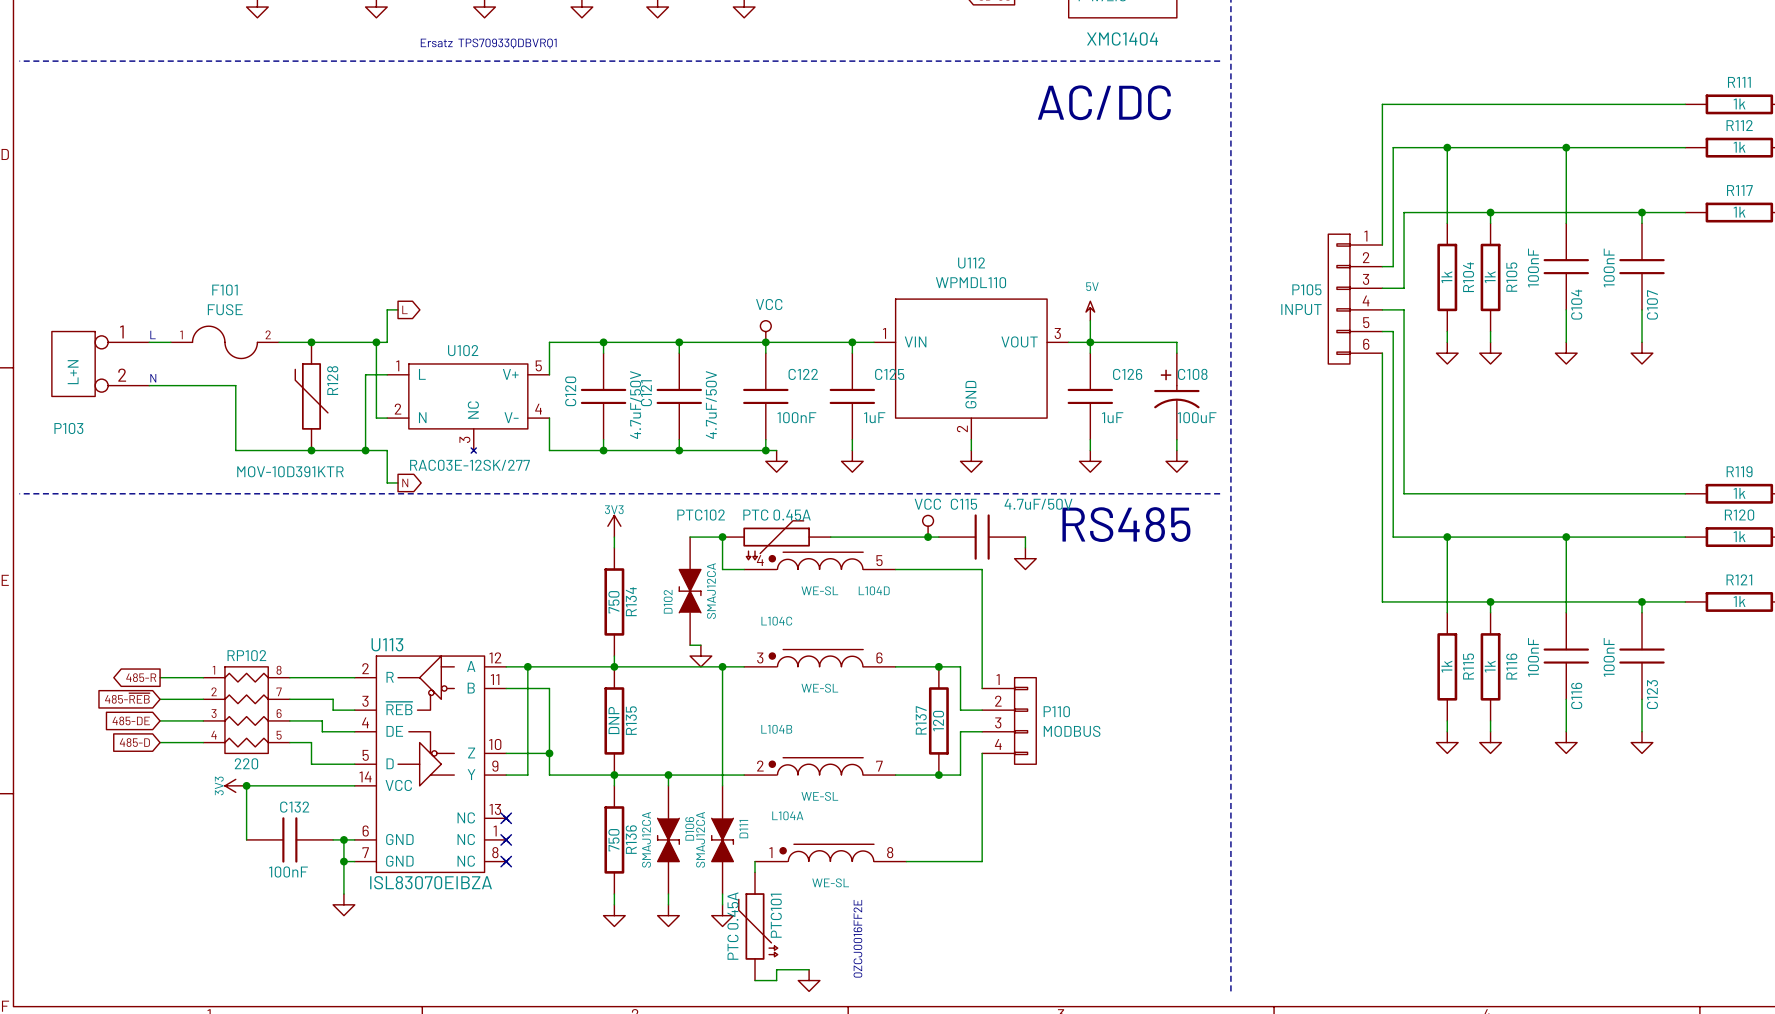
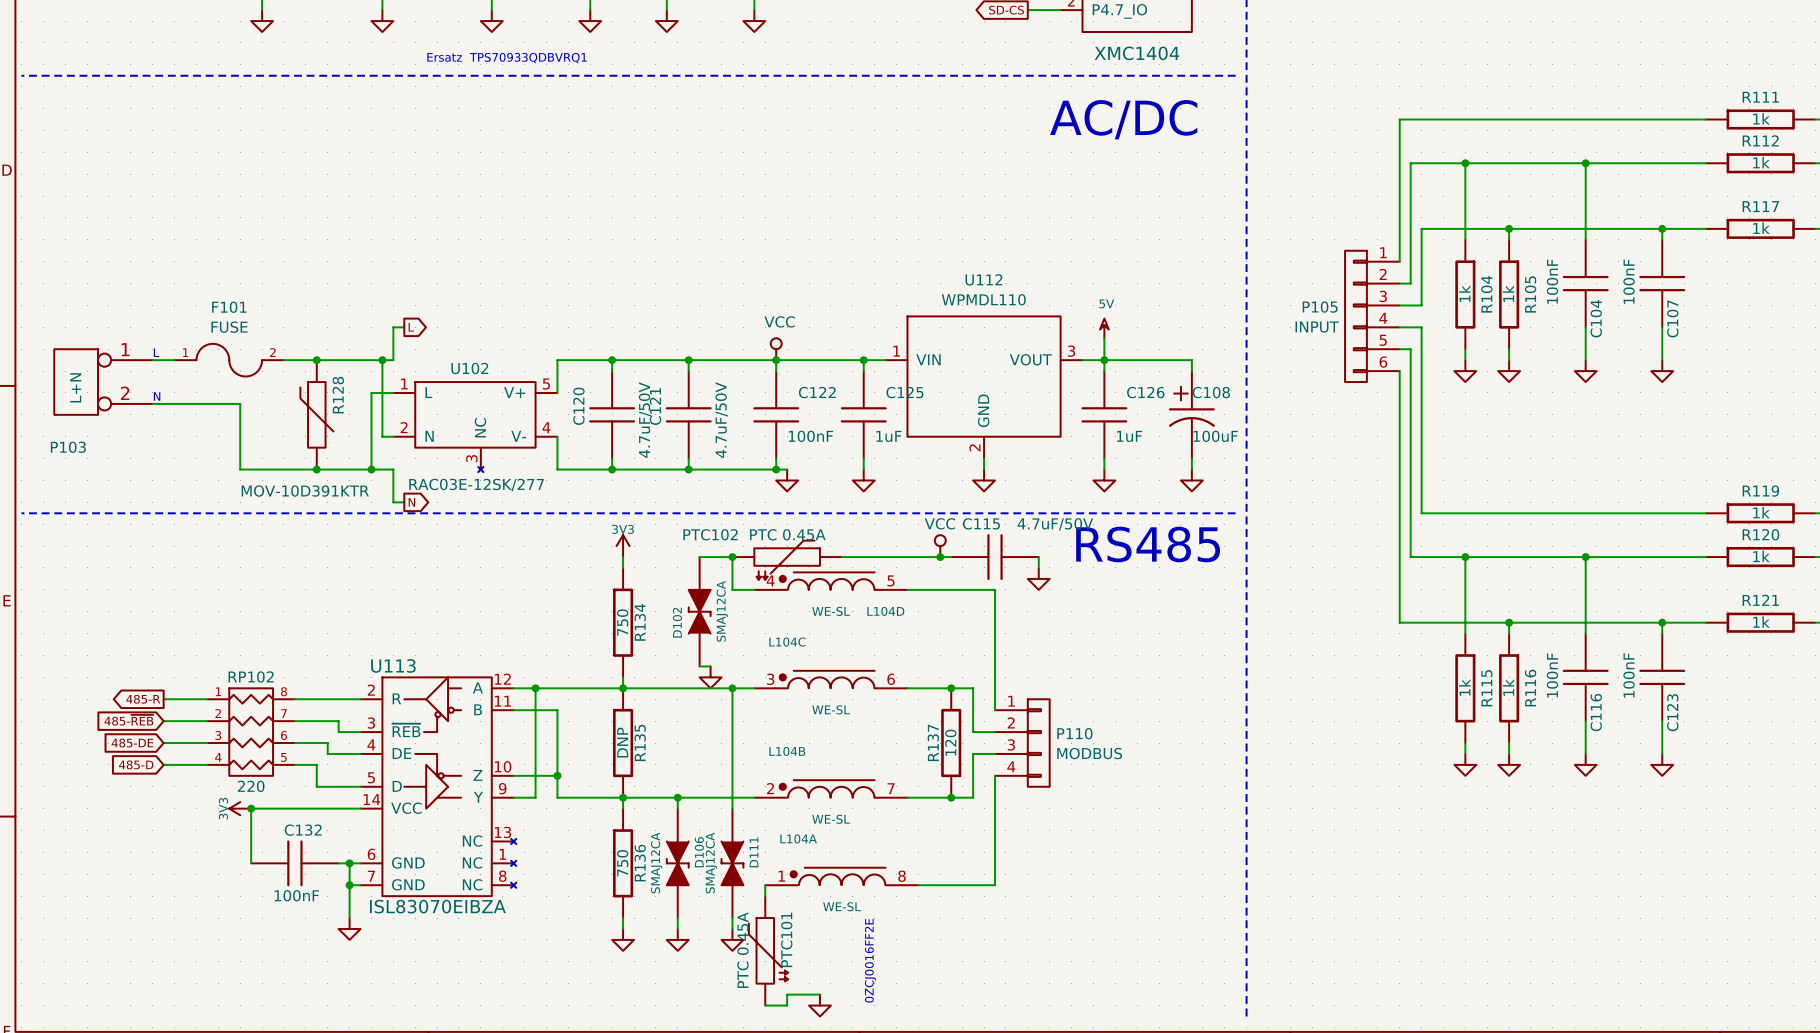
no-connect mark: (506, 818) -> none
no-connect mark: (506, 839) -> none
no-connect mark: (506, 861) -> none

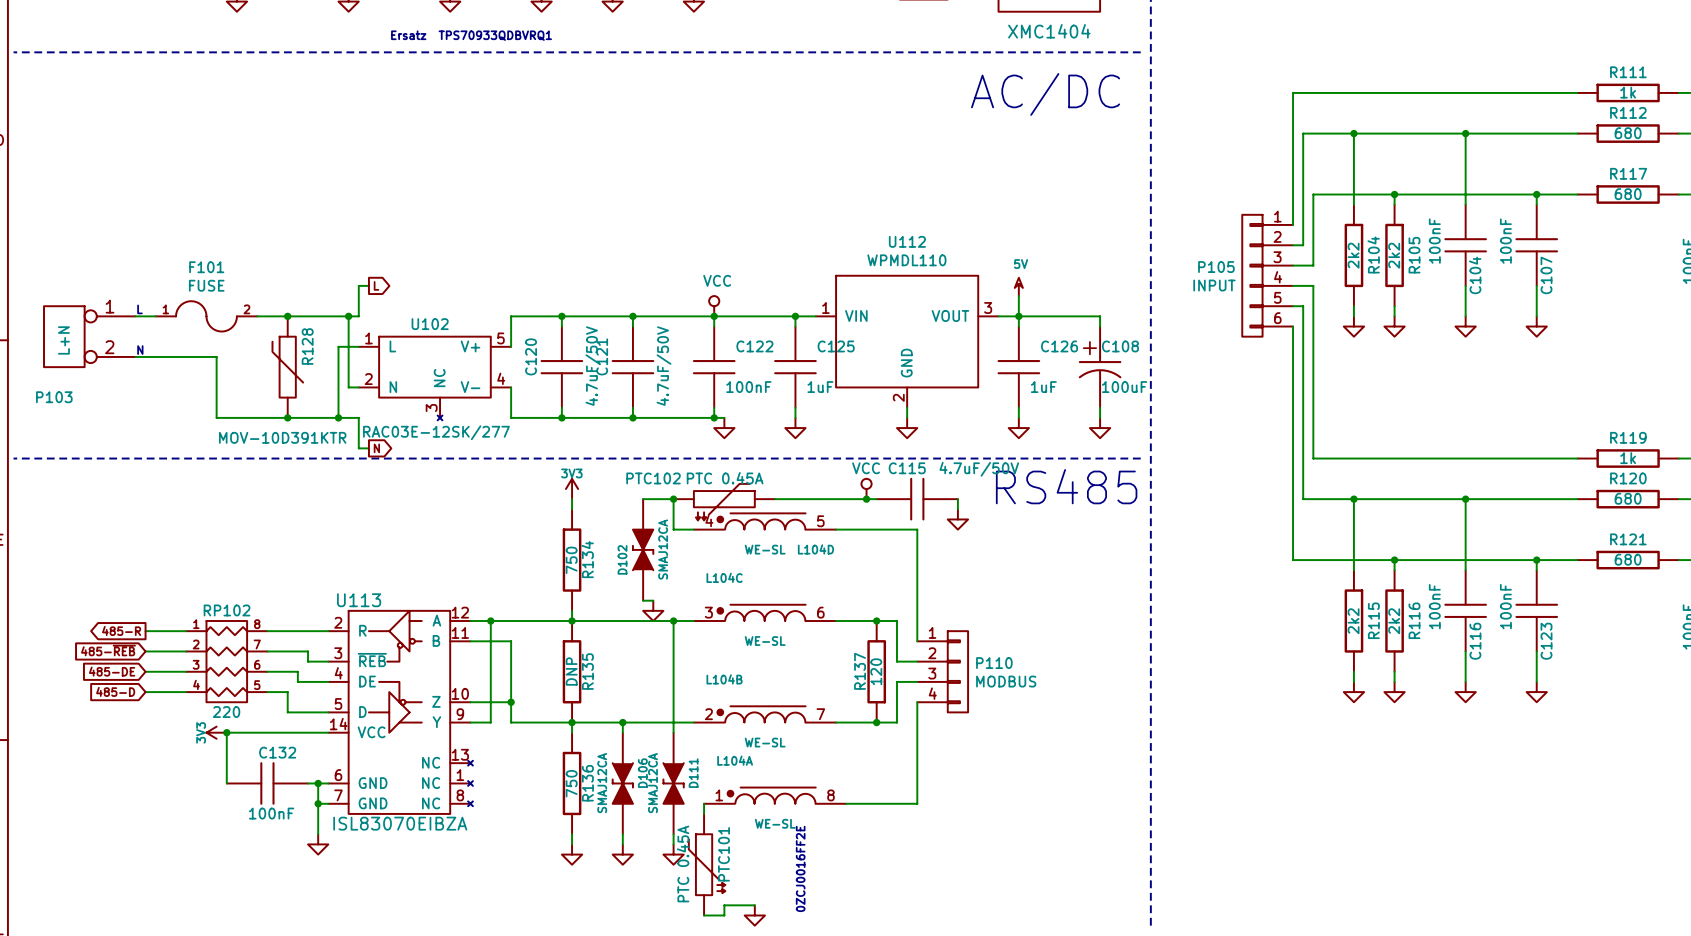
R112 value: 1k (1761, 162) -> 680 (1628, 133)
R117 value: 1k (1761, 228) -> 680 (1628, 194)
R104 value: 1k (1464, 293) -> 2k2 (1353, 255)
R105 value: 1k (1508, 293) -> 2k2 (1394, 255)
R120 value: 1k (1761, 556) -> 680 (1628, 498)
R121 value: 1k (1761, 622) -> 680 (1628, 559)
R115 value: 1k (1464, 687) -> 2k2 (1353, 621)
R116 value: 1k (1508, 687) -> 2k2 (1394, 621)

